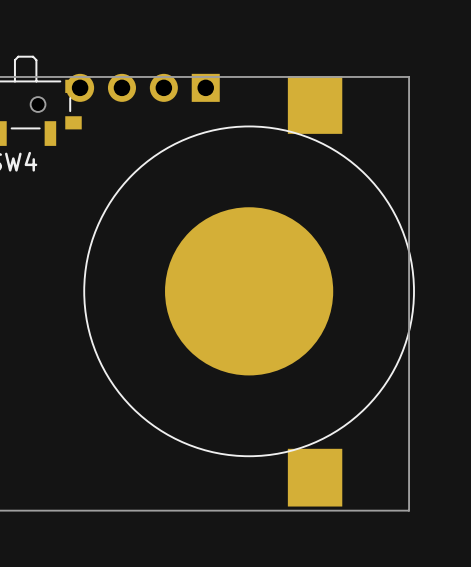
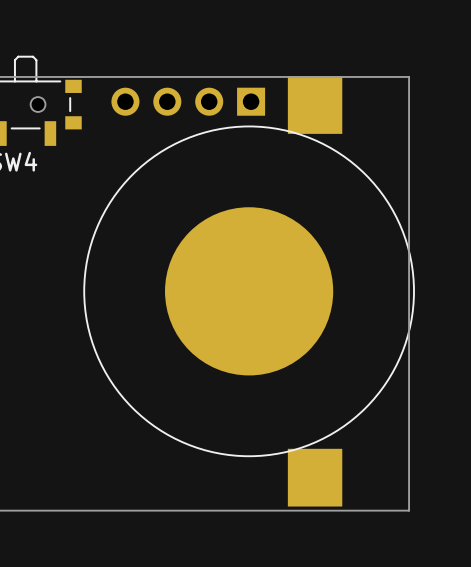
part position: (142, 87) -> (188, 101)

